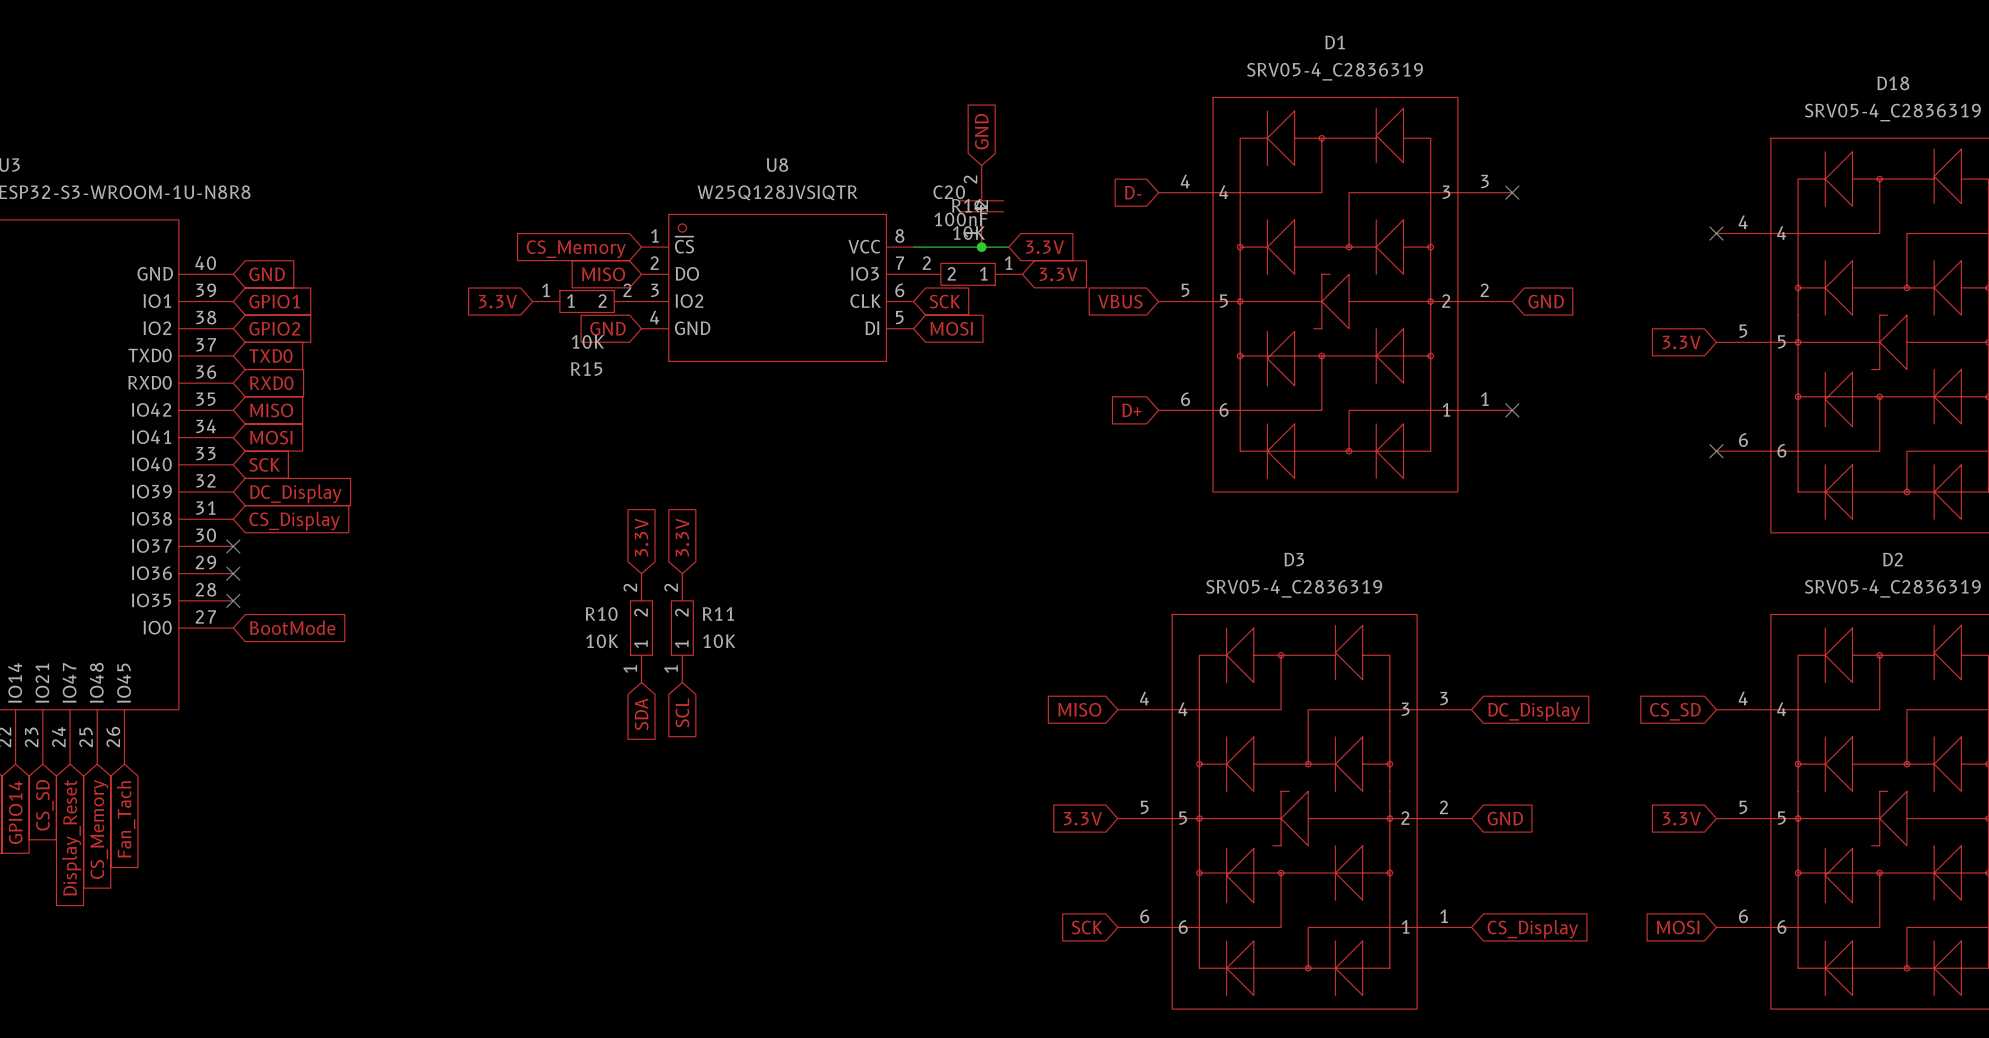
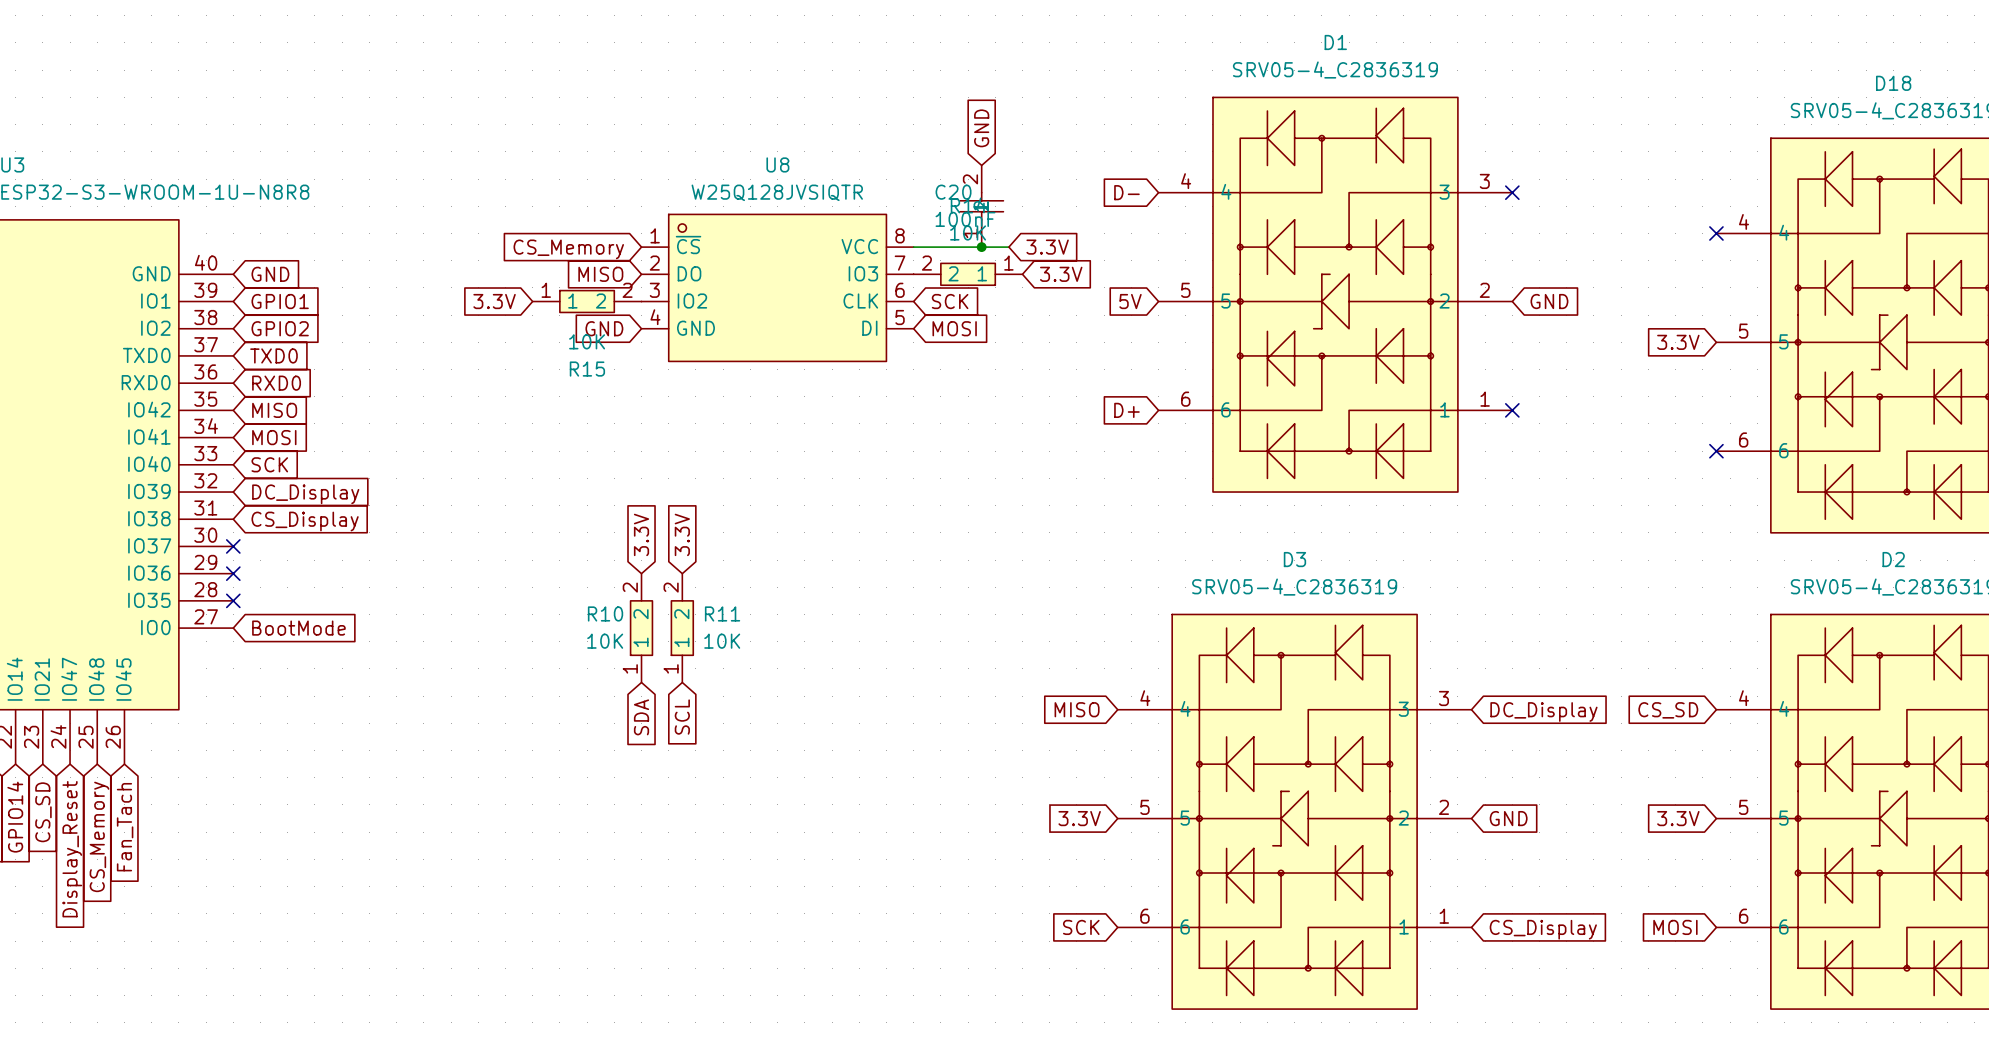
global label: VBUS (1120, 301) -> 5V (1130, 301)

